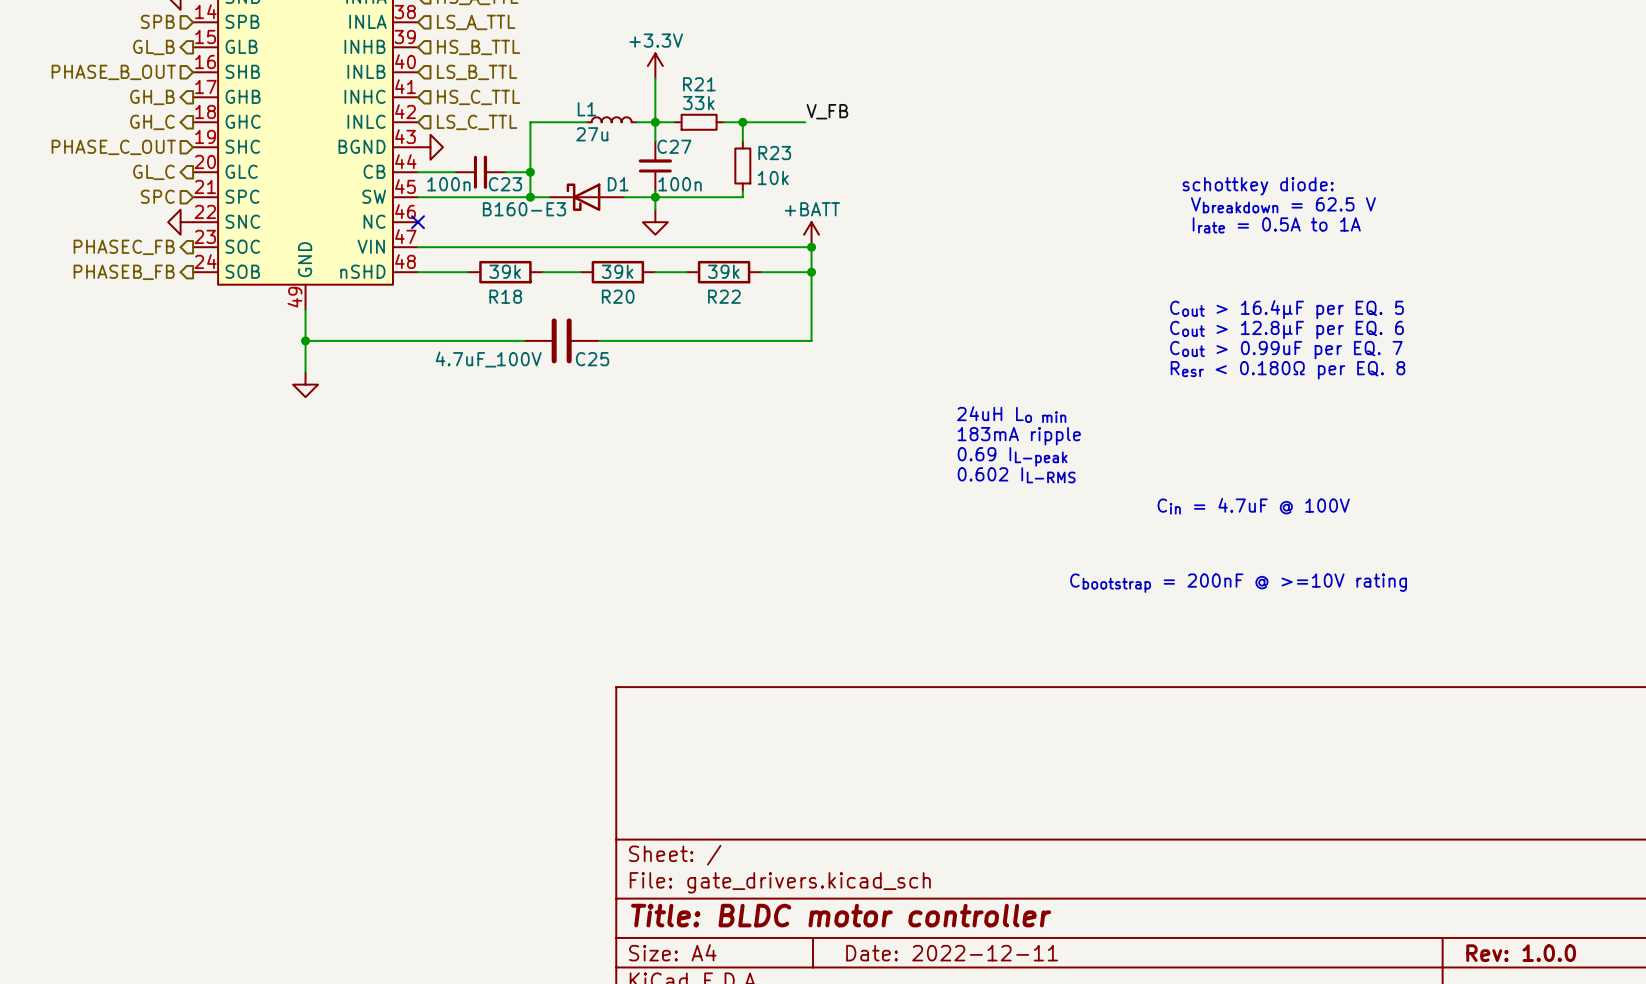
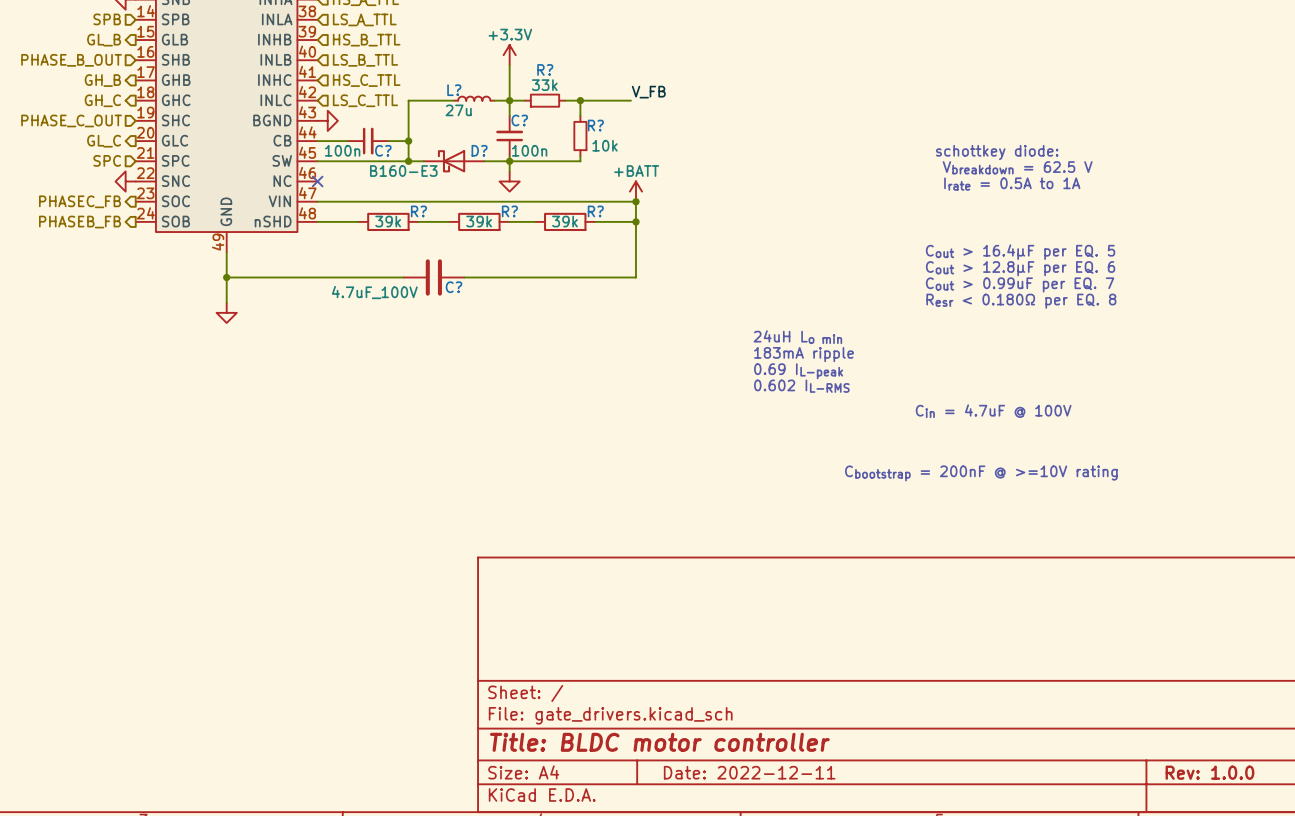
R21 name: R21 (699, 84) -> R? (545, 69)
L1 name: L1 (586, 109) -> L? (454, 90)
C27 name: C27 (674, 146) -> C? (519, 120)
R23 name: R23 (774, 153) -> R? (595, 125)
C23 name: C23 (505, 184) -> C? (383, 150)
D1 name: D1 (618, 184) -> D? (479, 150)
R18 name: R18 (505, 296) -> R? (418, 211)
R20 name: R20 (618, 296) -> R? (509, 211)
R22 name: R22 (724, 296) -> R? (595, 211)
C25 name: C25 (592, 359) -> C? (454, 287)

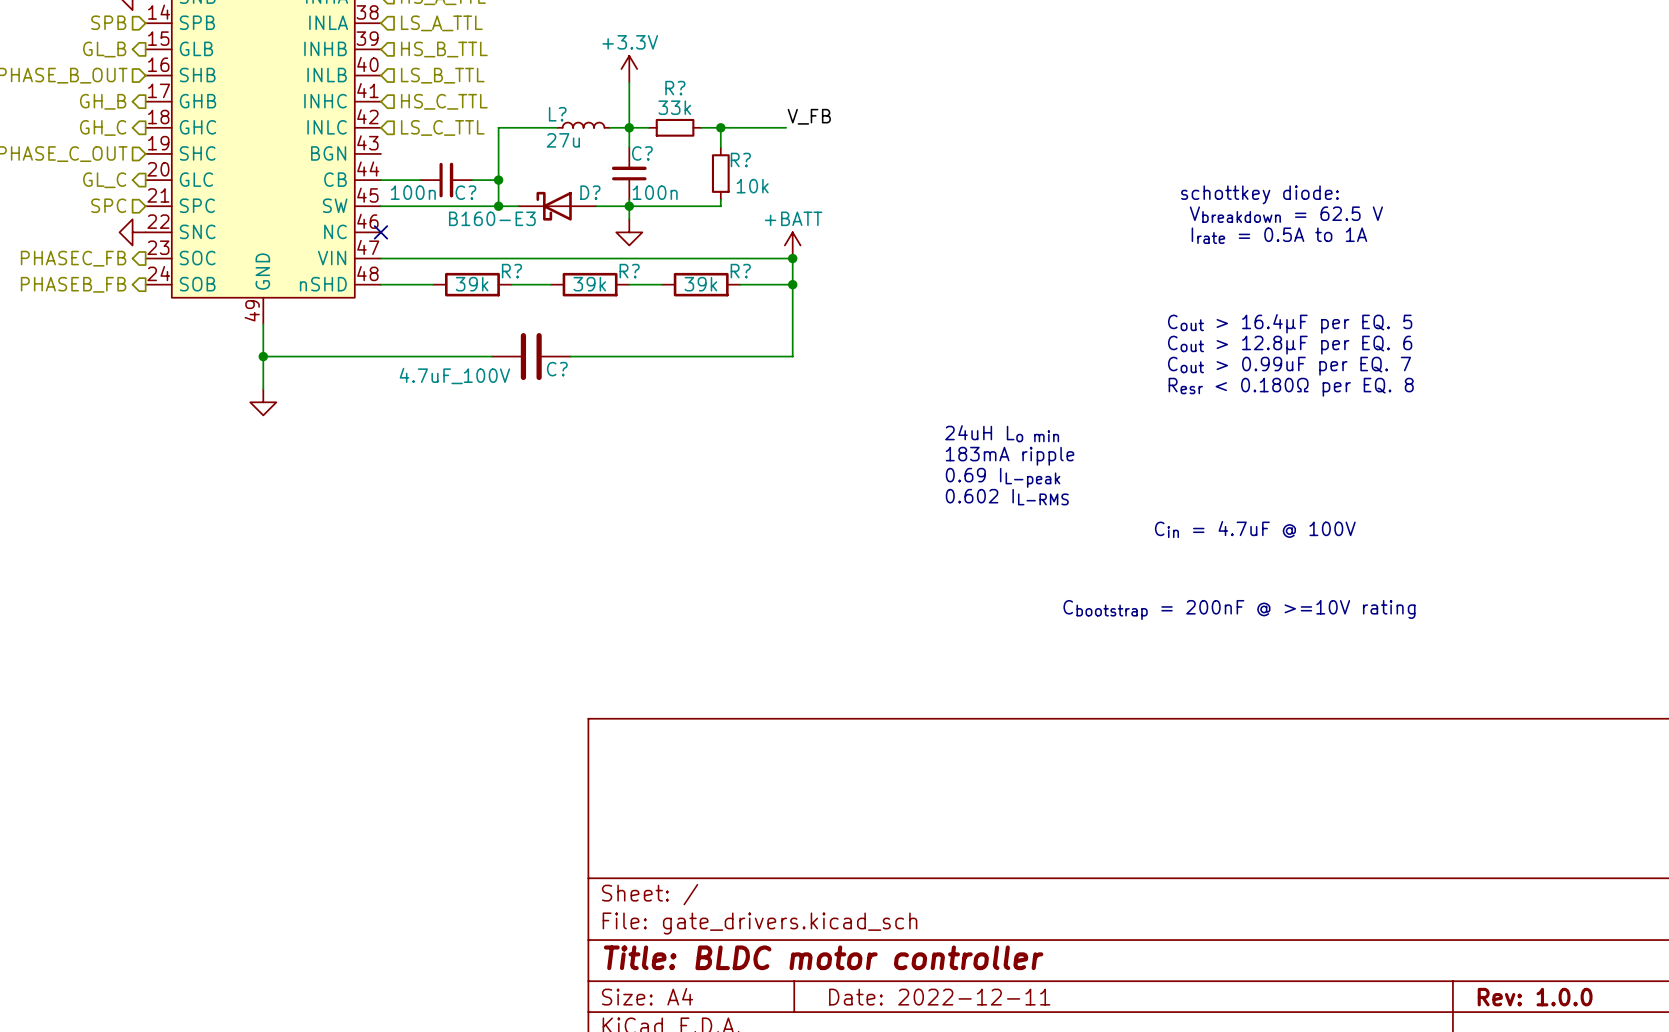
part pin name: BGND (272, 120) -> BGN (328, 153)
power symbol: (327, 120) -> none

